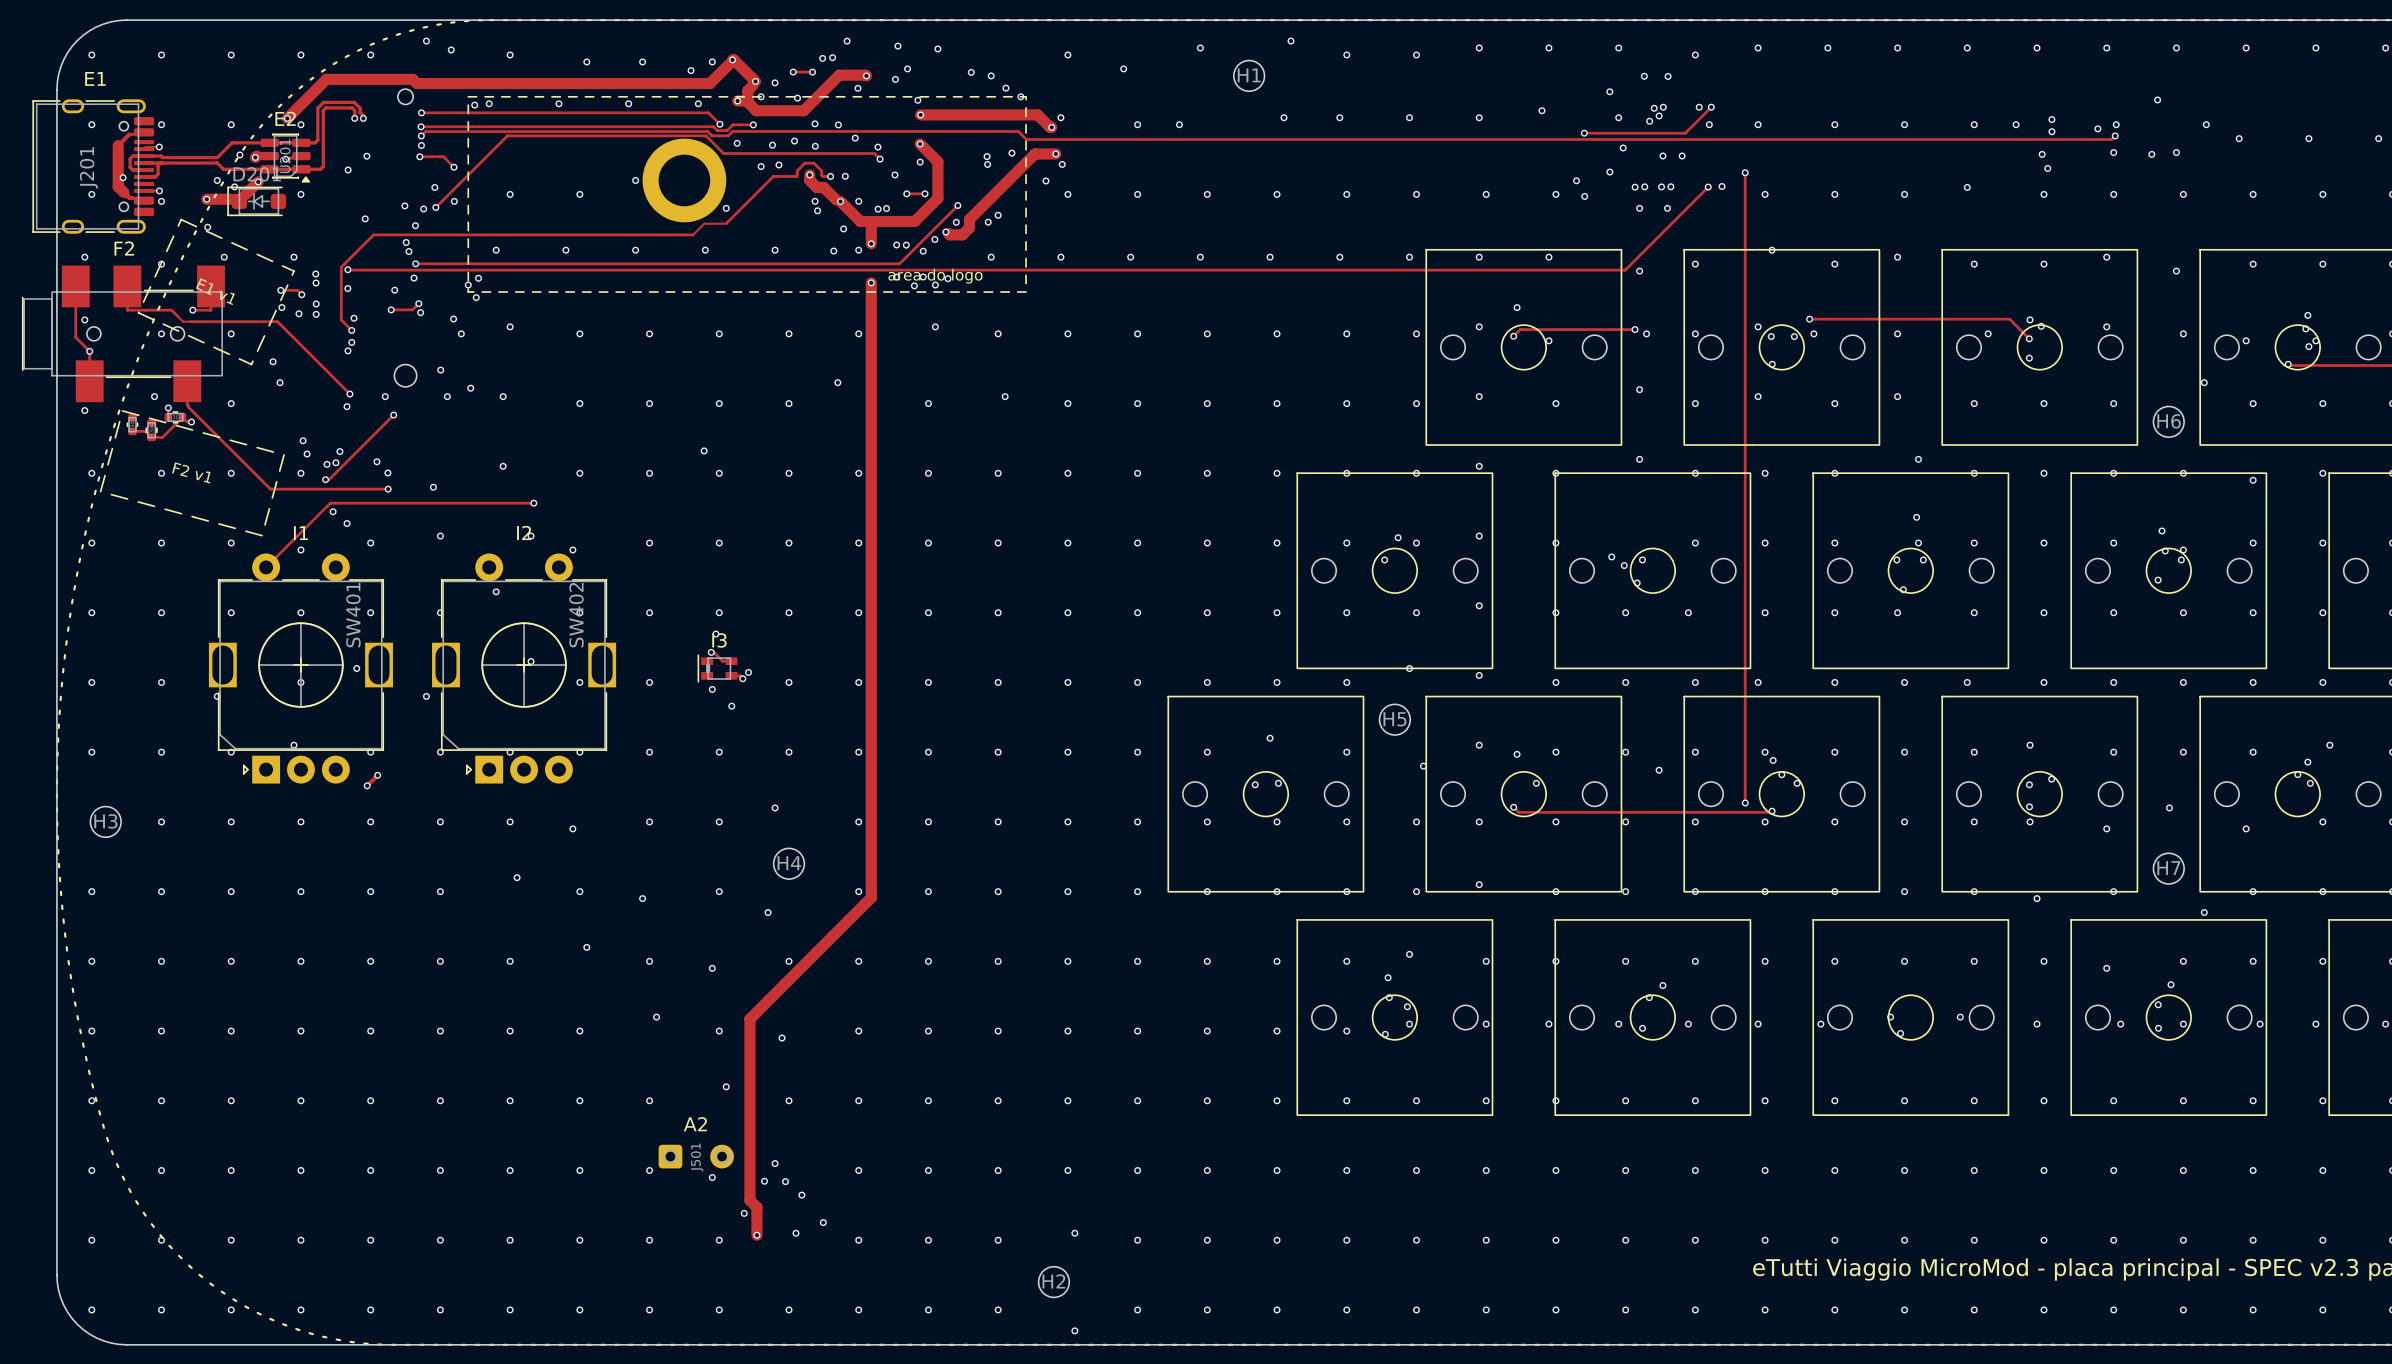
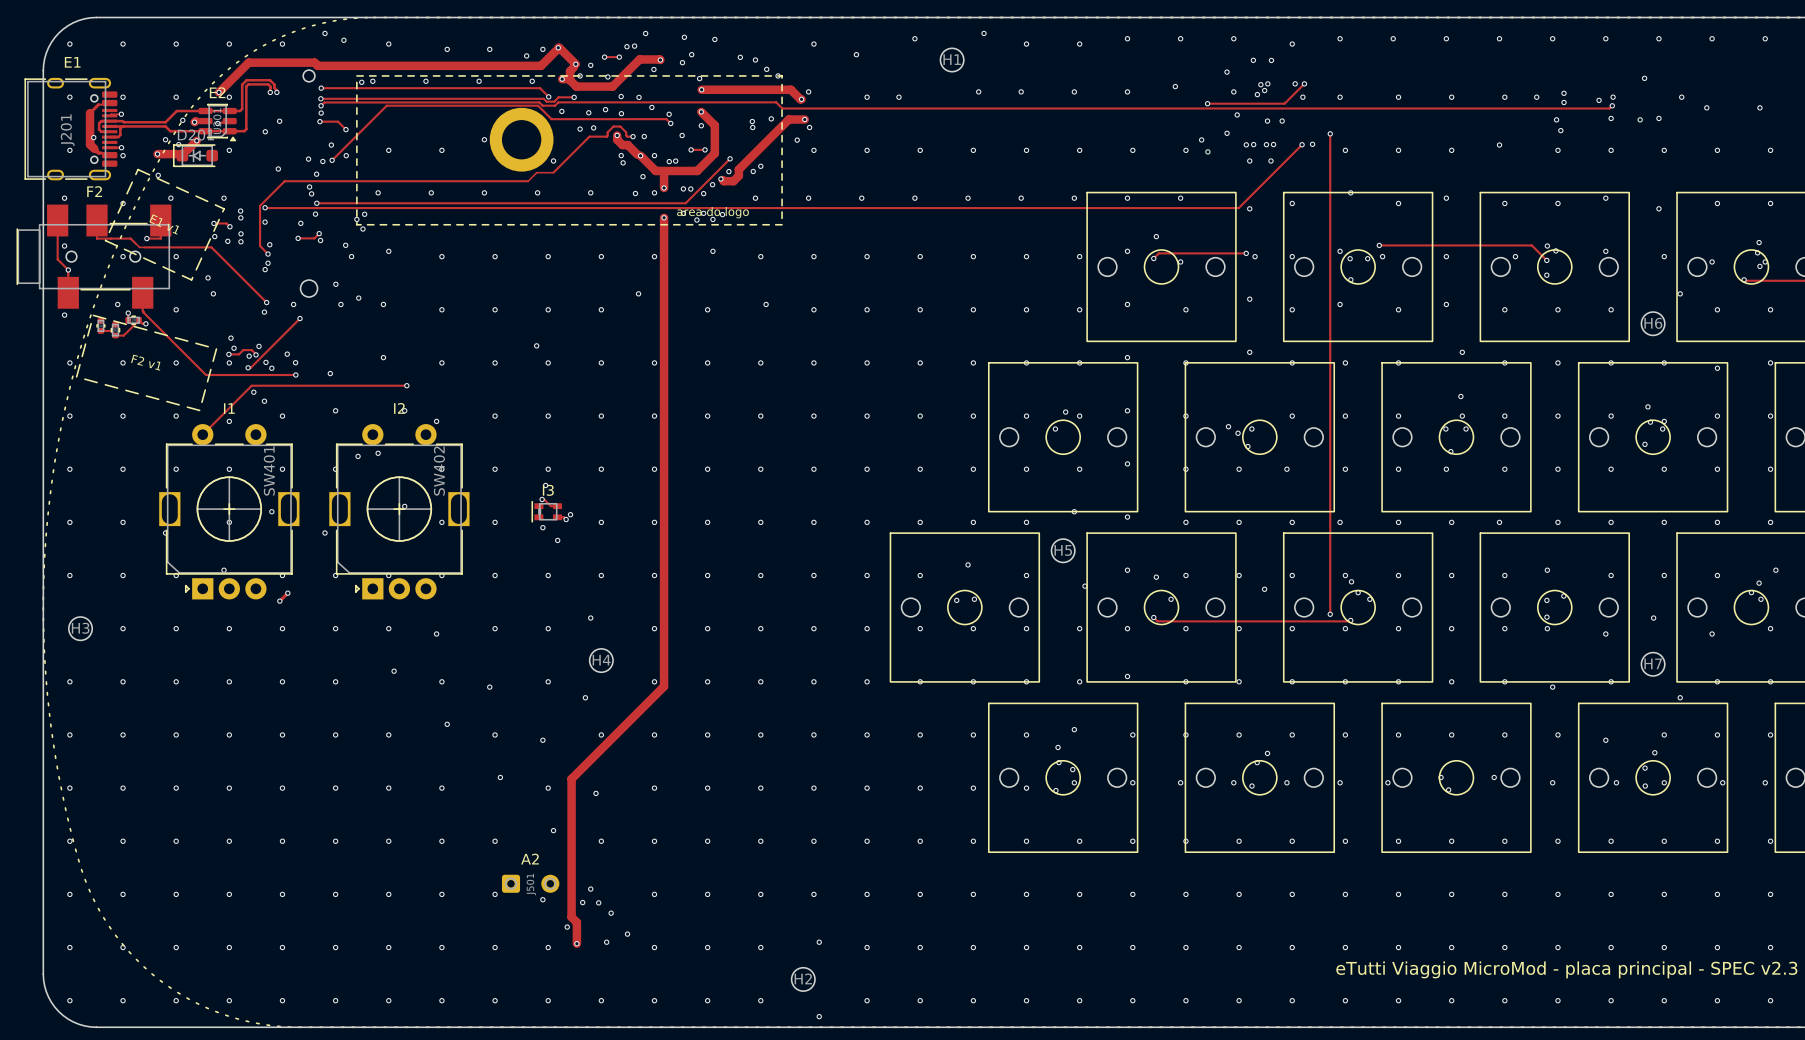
track: none -> (228, 354) (239, 354) (243, 350) (251, 350) (256, 354)
via: none -> (228, 354)
via: none -> (266, 362)
via: none -> (271, 368)
via: none -> (358, 456)

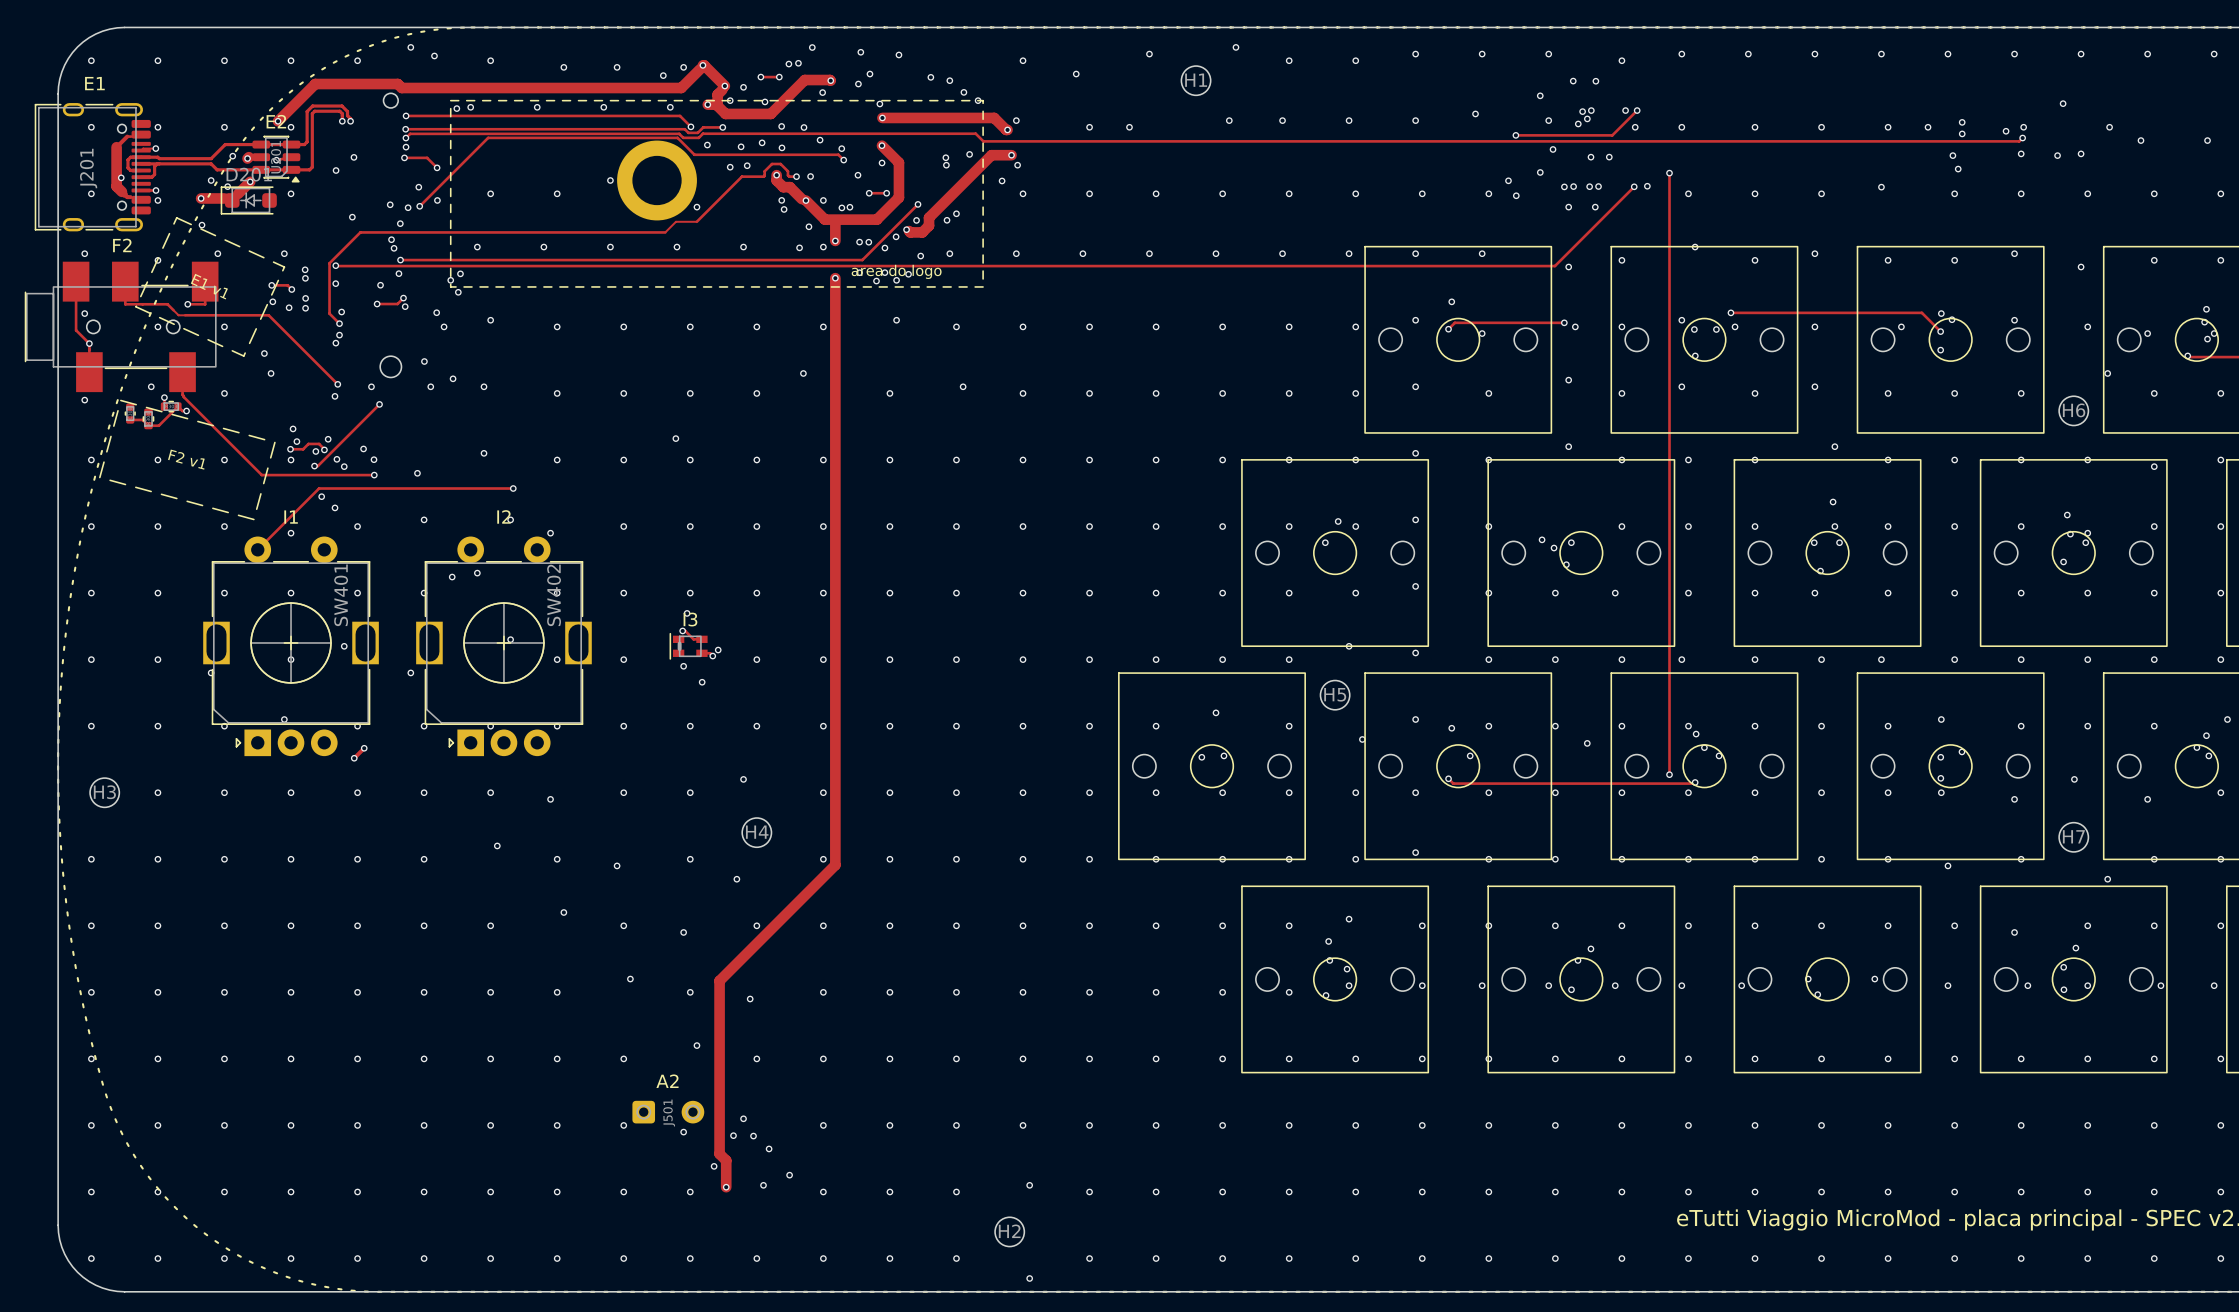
via: none -> (920, 256)

